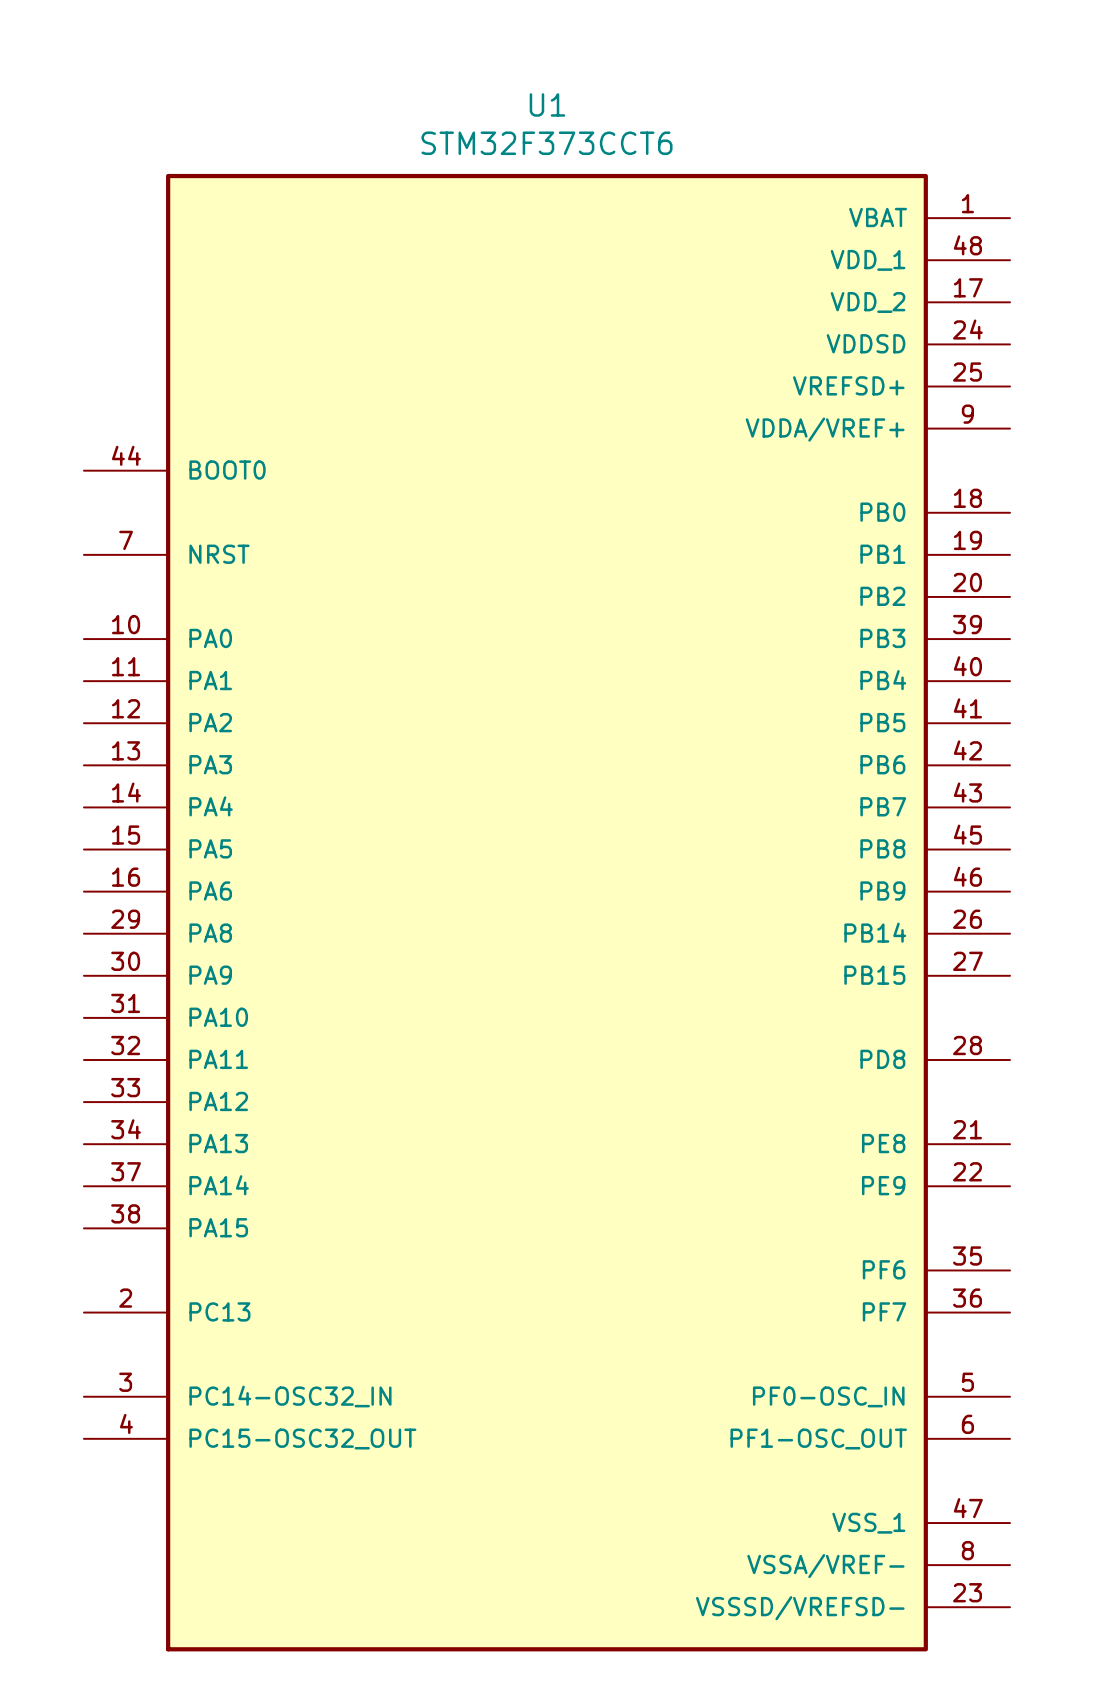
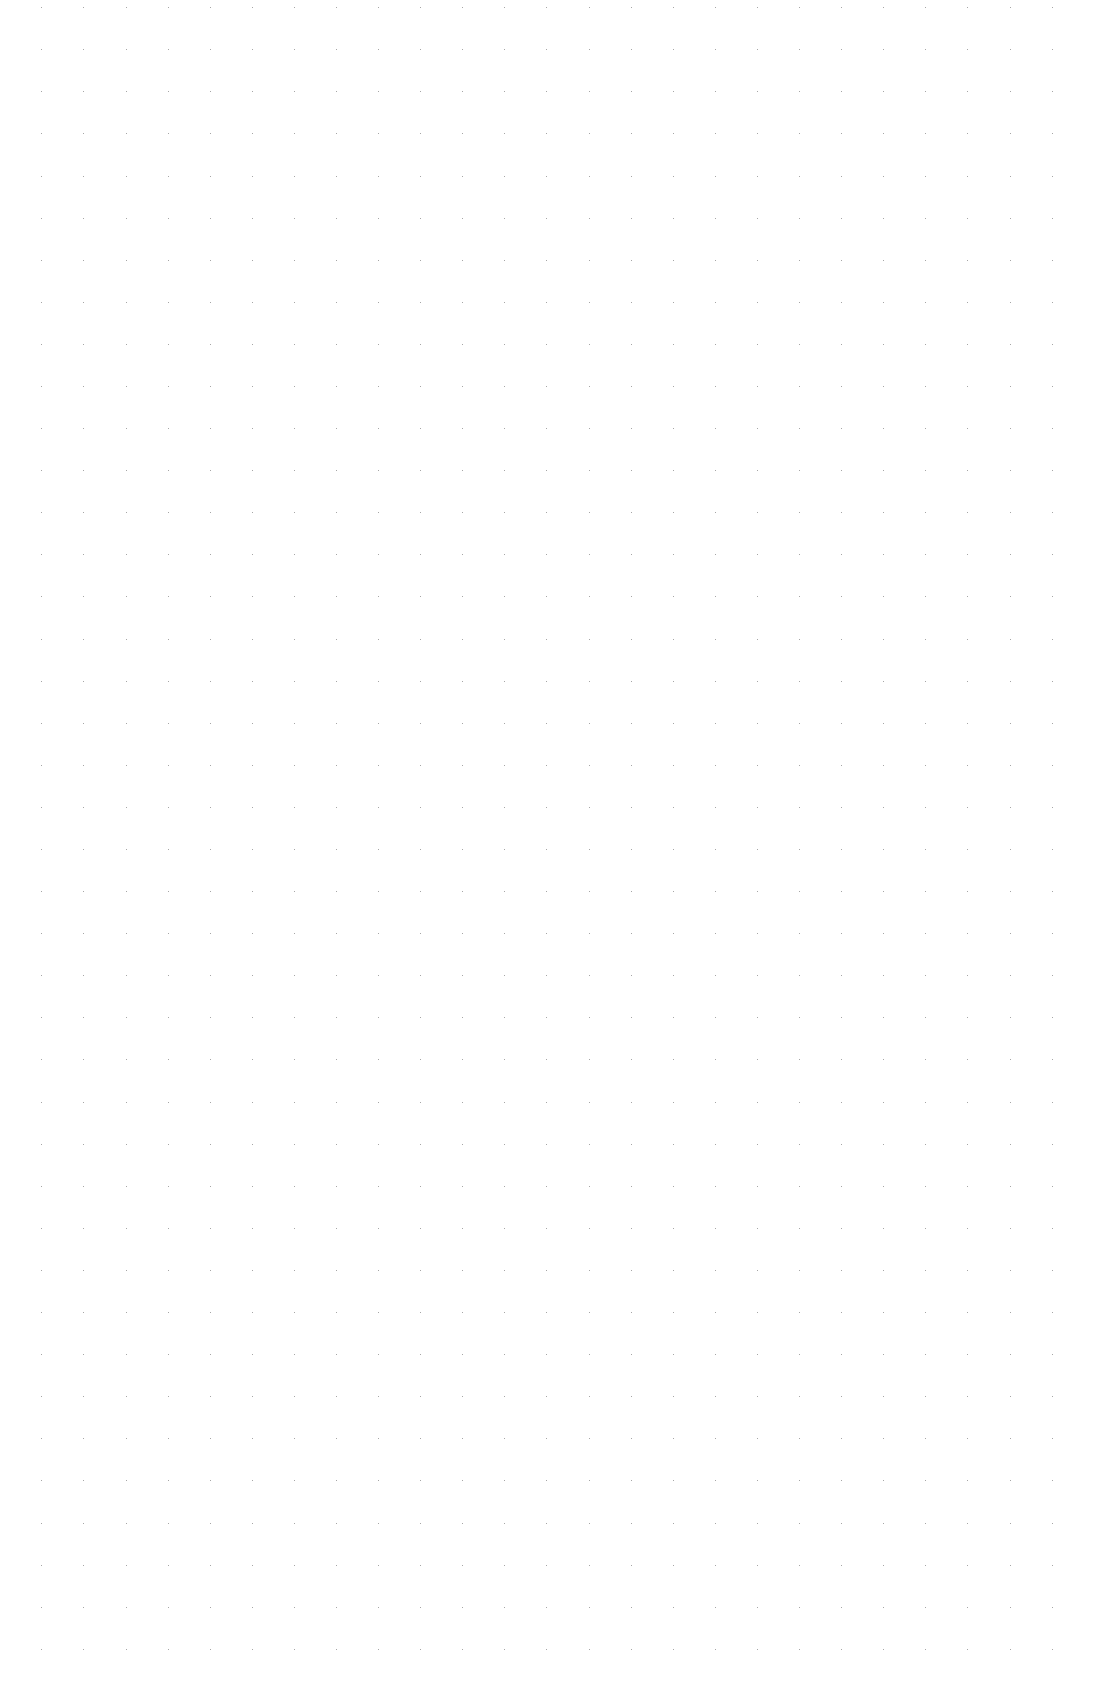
U1: STM32F373CCT6 (546, 912) -> none

